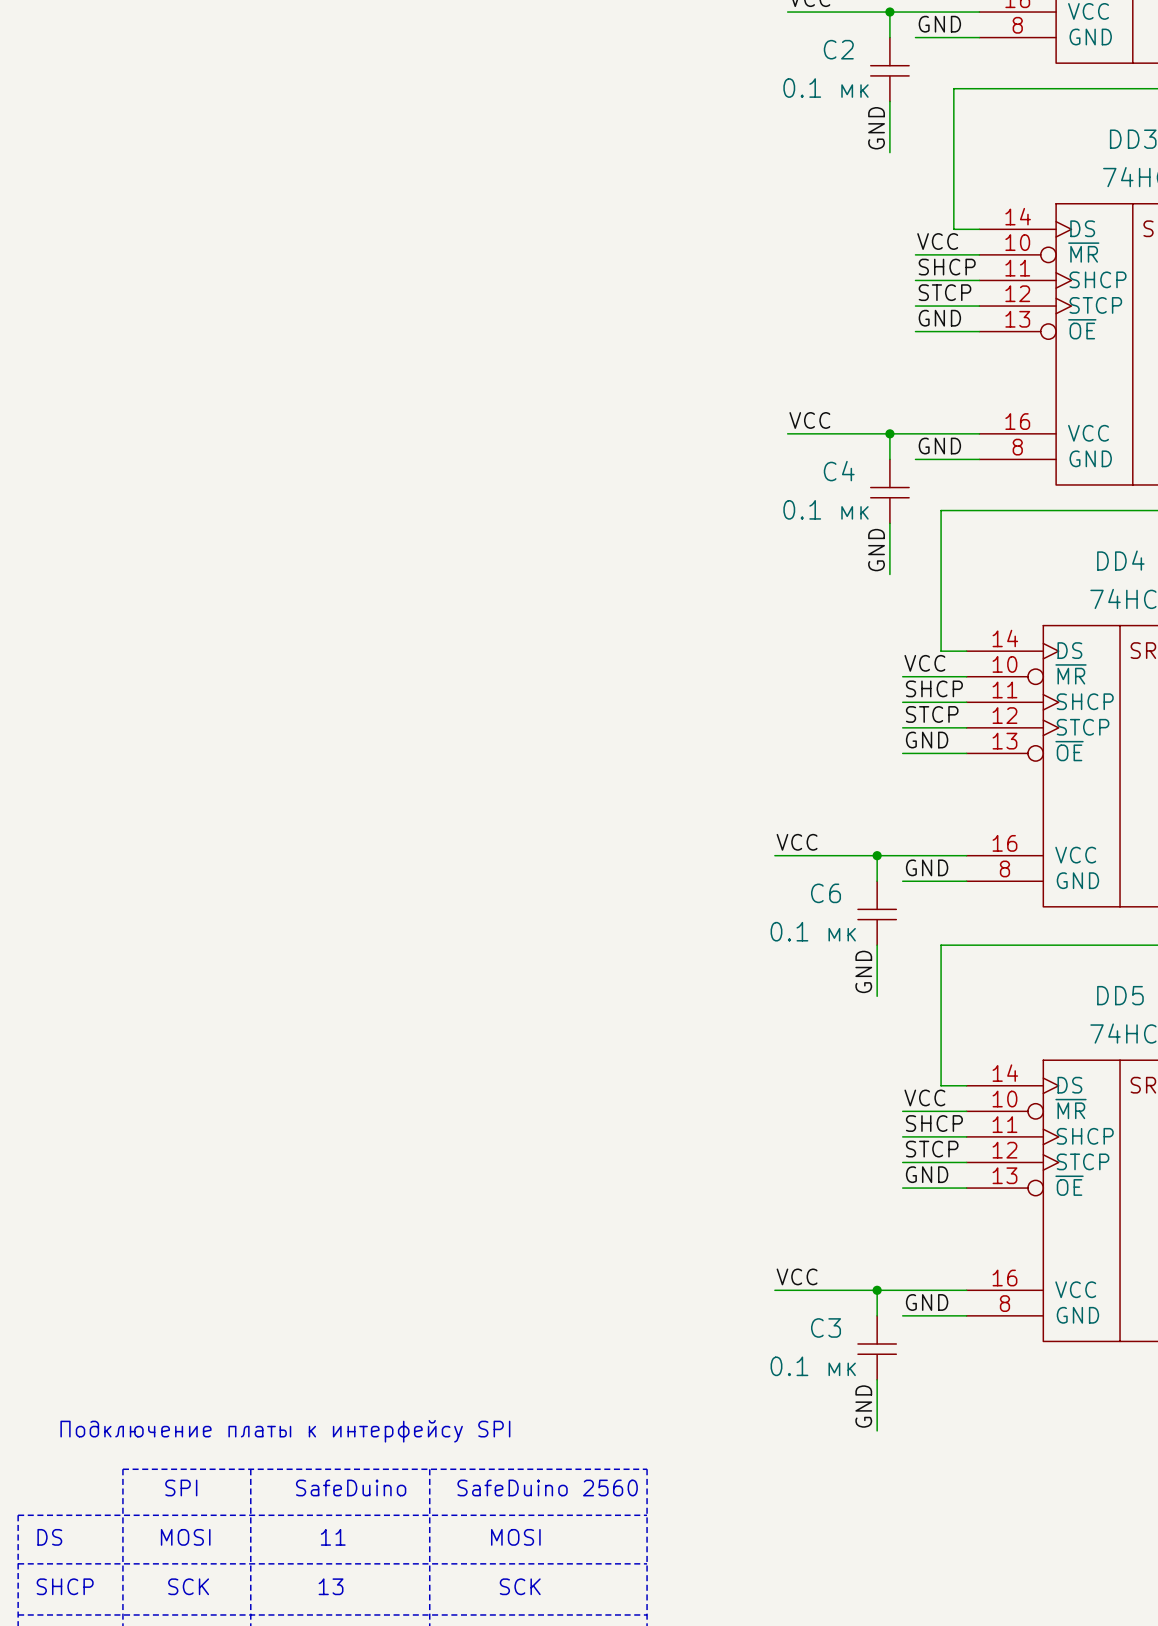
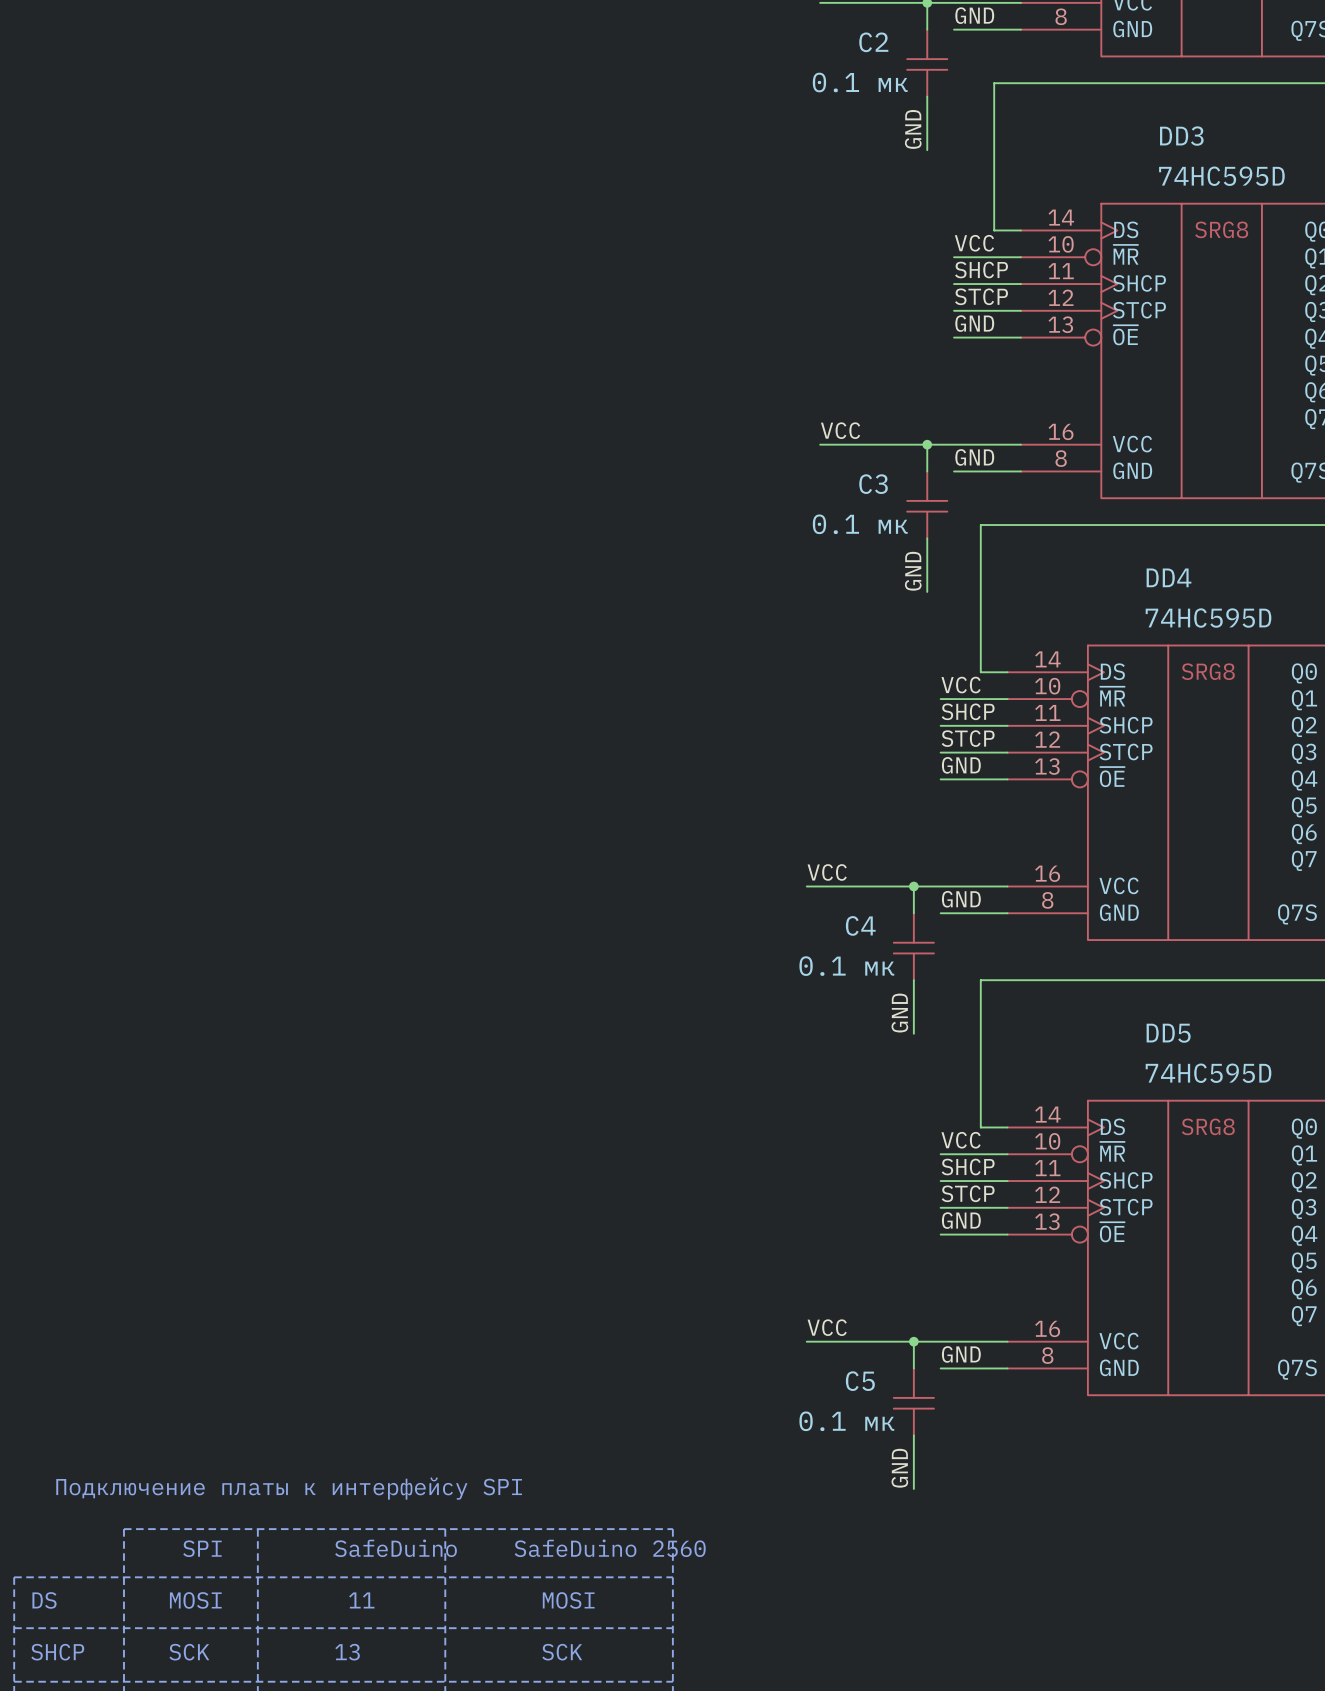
C4 name: C4 (839, 471) -> C3 (873, 484)
C6 name: C6 (826, 893) -> C4 (860, 925)
C3 name: C3 (826, 1327) -> C5 (860, 1381)

